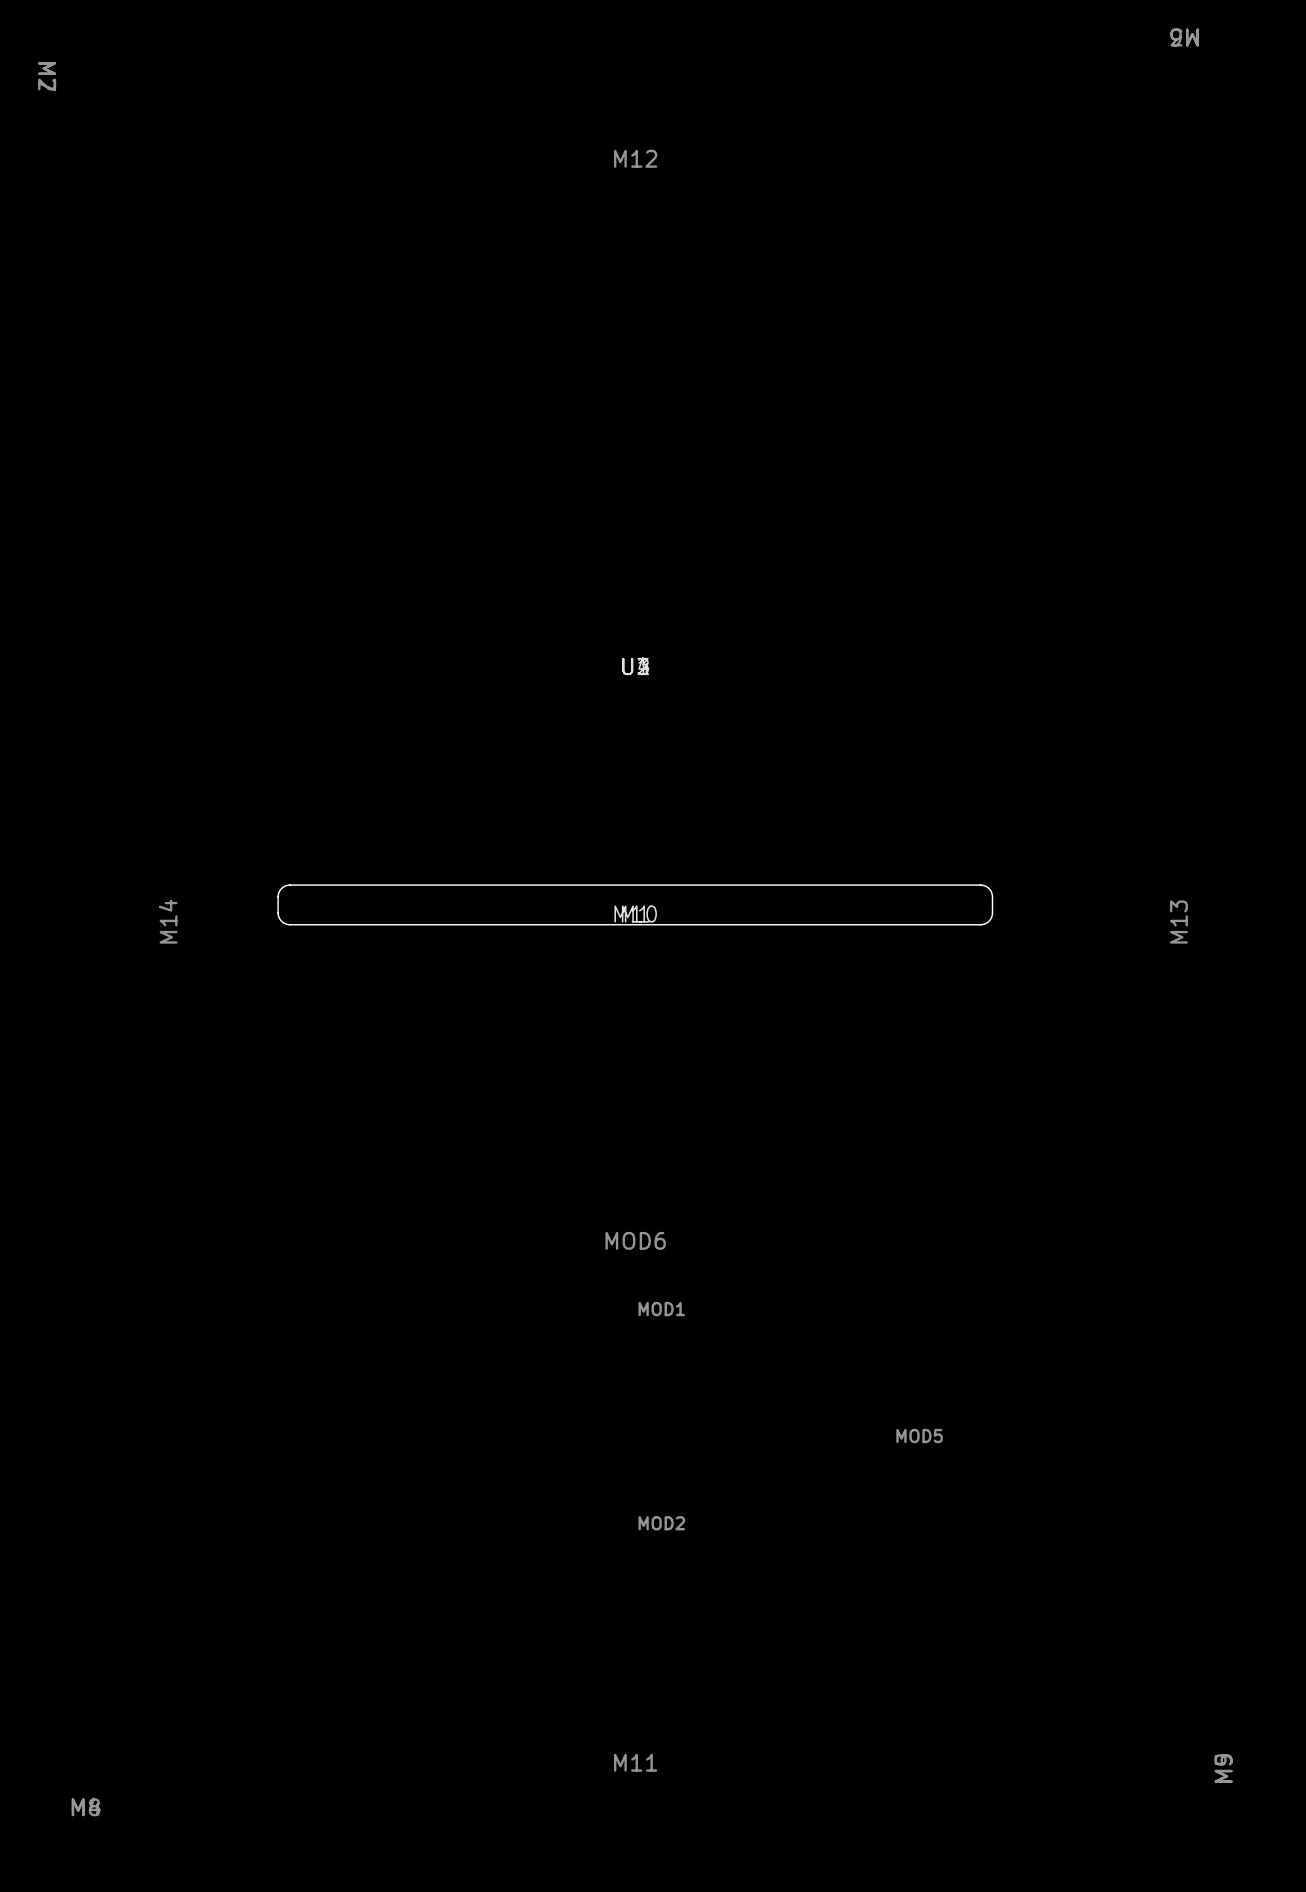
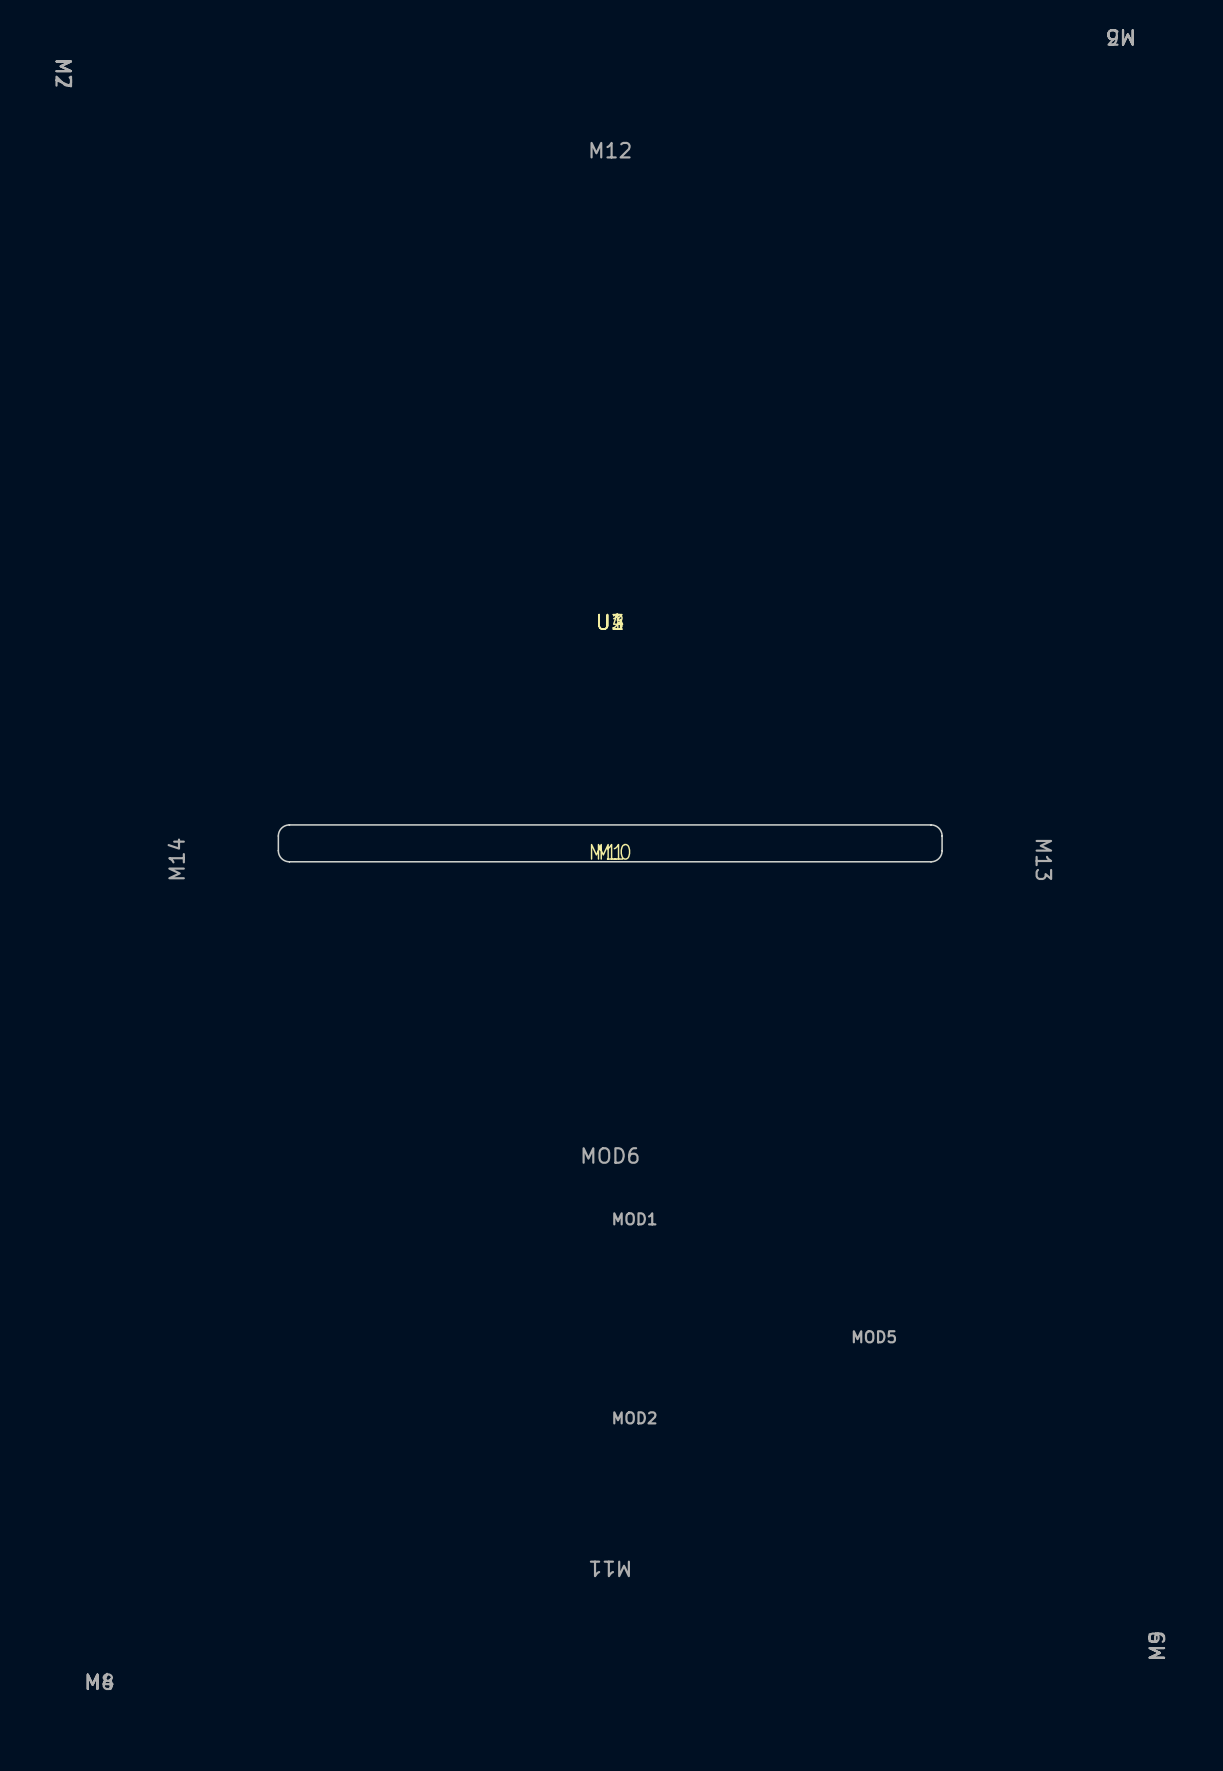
M13 position: (1178, 922) -> (1043, 859)
M13 name rotation: 0° (1178, 922) -> 180° (1043, 859)
M11 position: (635, 1762) -> (609, 1568)
M11 name rotation: 0° (635, 1762) -> 180° (609, 1568)

